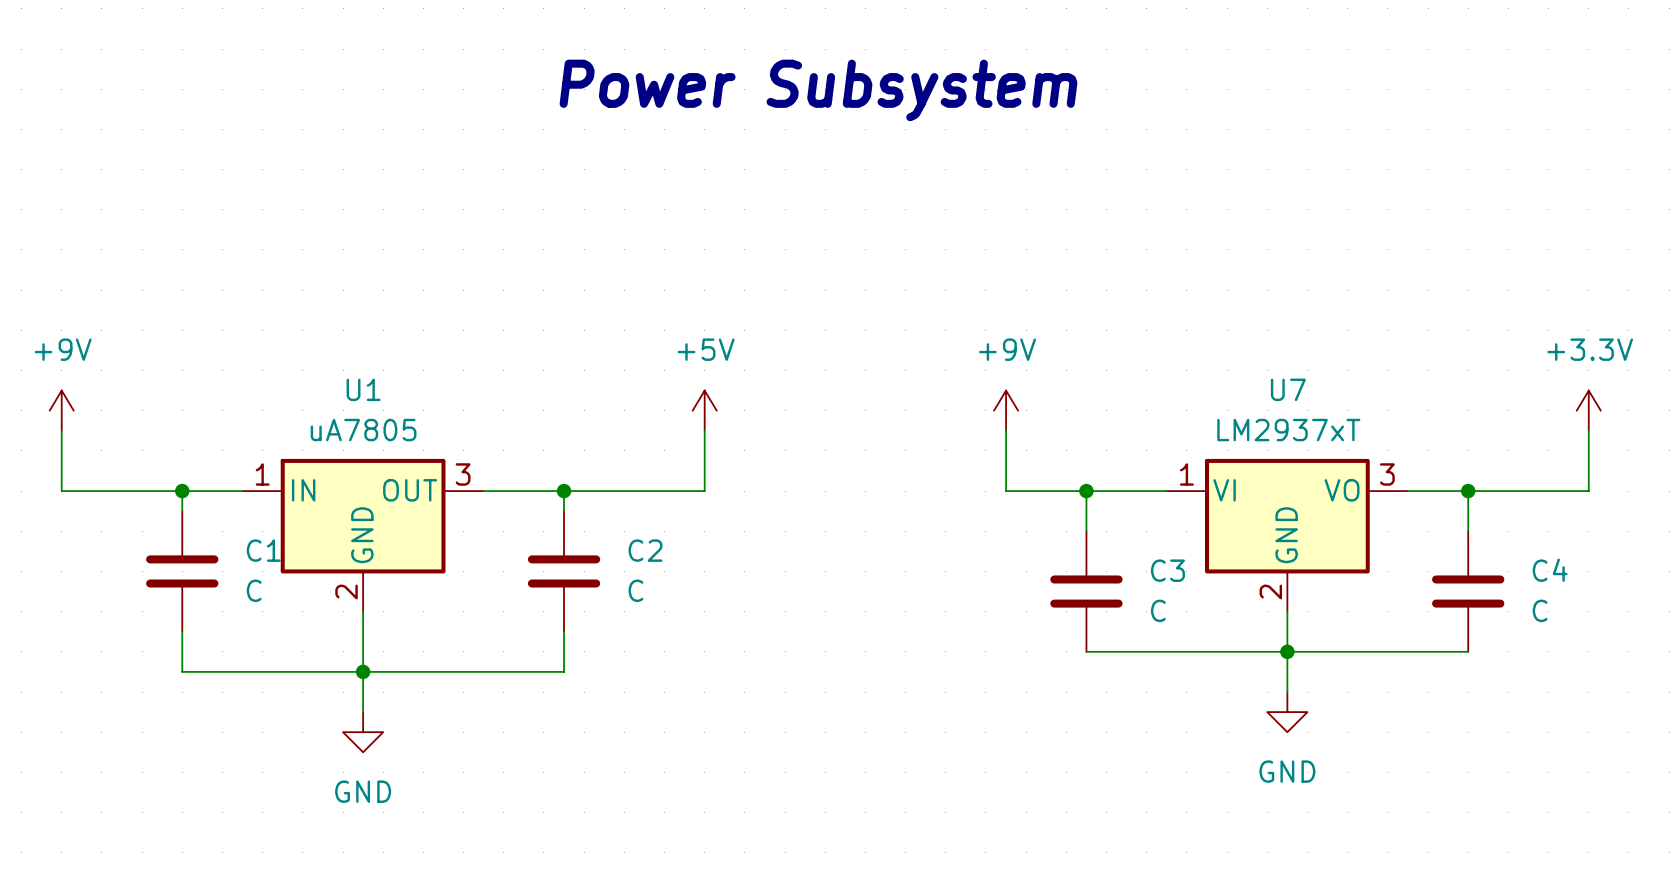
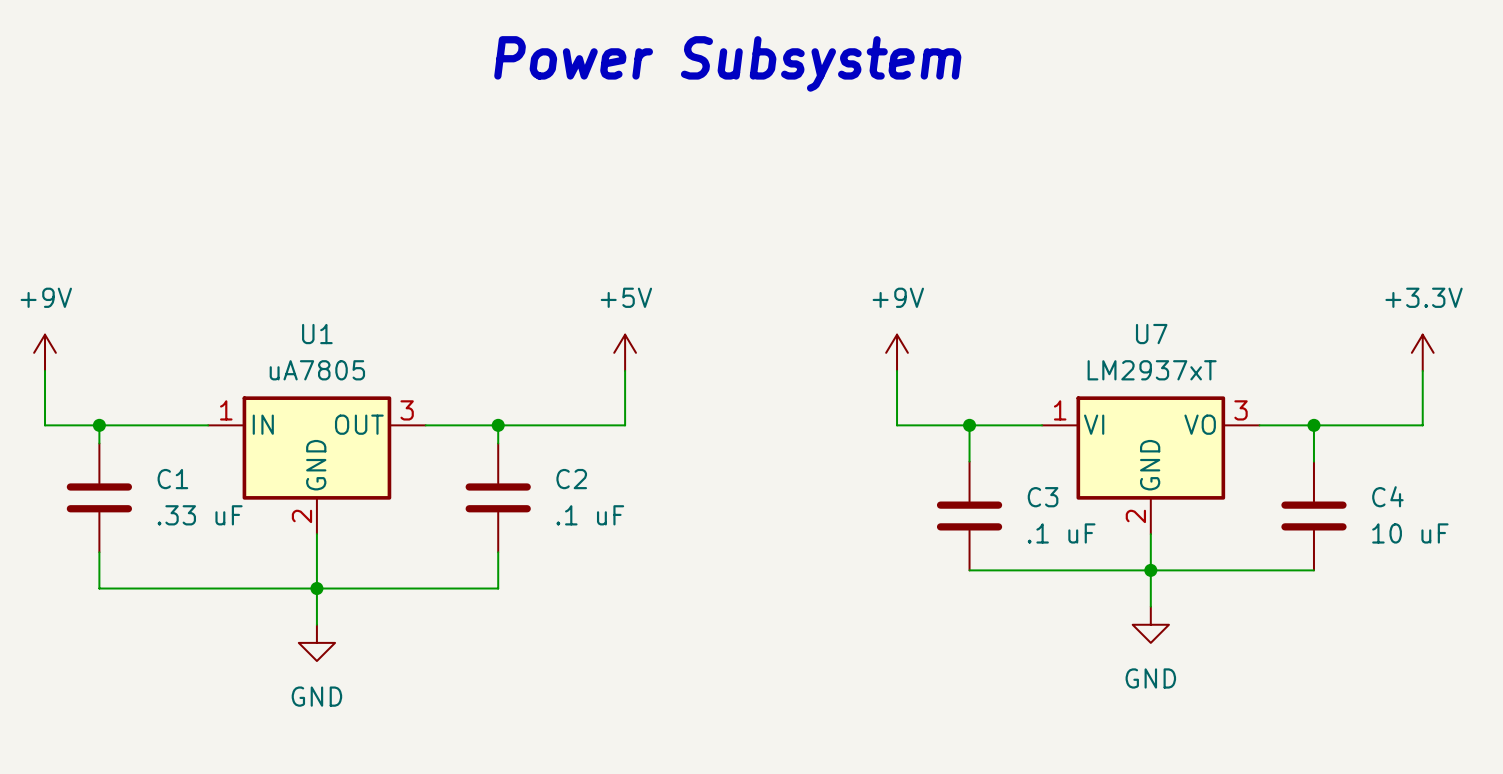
wire: (182, 491) (182, 511) -> (99, 425) (99, 443)
junction position: (182, 491) -> (99, 425)
C1 position: (182, 571) -> (99, 497)
C1 value: C (254, 590) -> .33 uF (200, 515)
C2 value: C (635, 590) -> .1 uF (590, 515)
C3 value: C (1158, 610) -> .1 uF (1061, 533)
C4 value: C (1540, 610) -> 10 uF (1410, 533)
wire: (182, 631) (182, 671) -> (99, 552) (99, 588) (153, 588)

